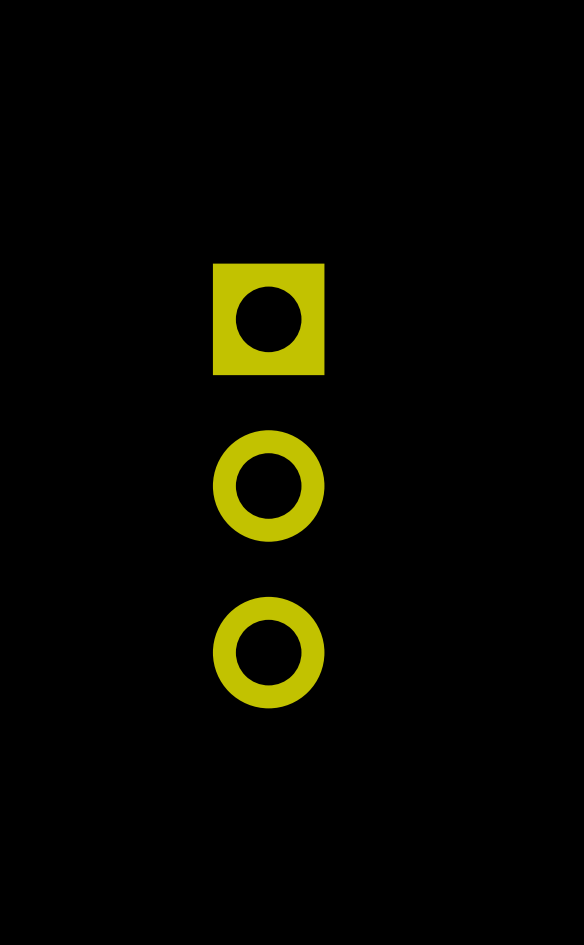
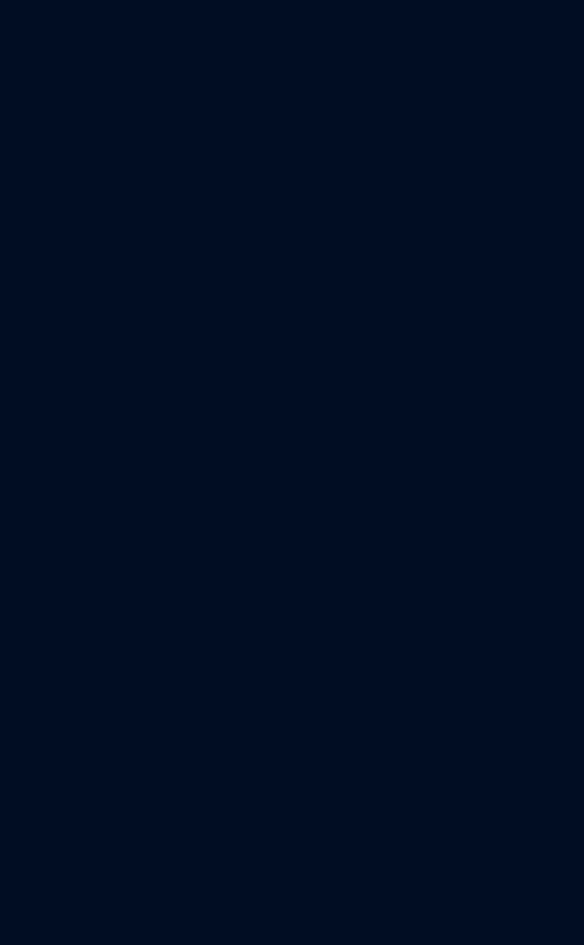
part: (268, 485) -> none

